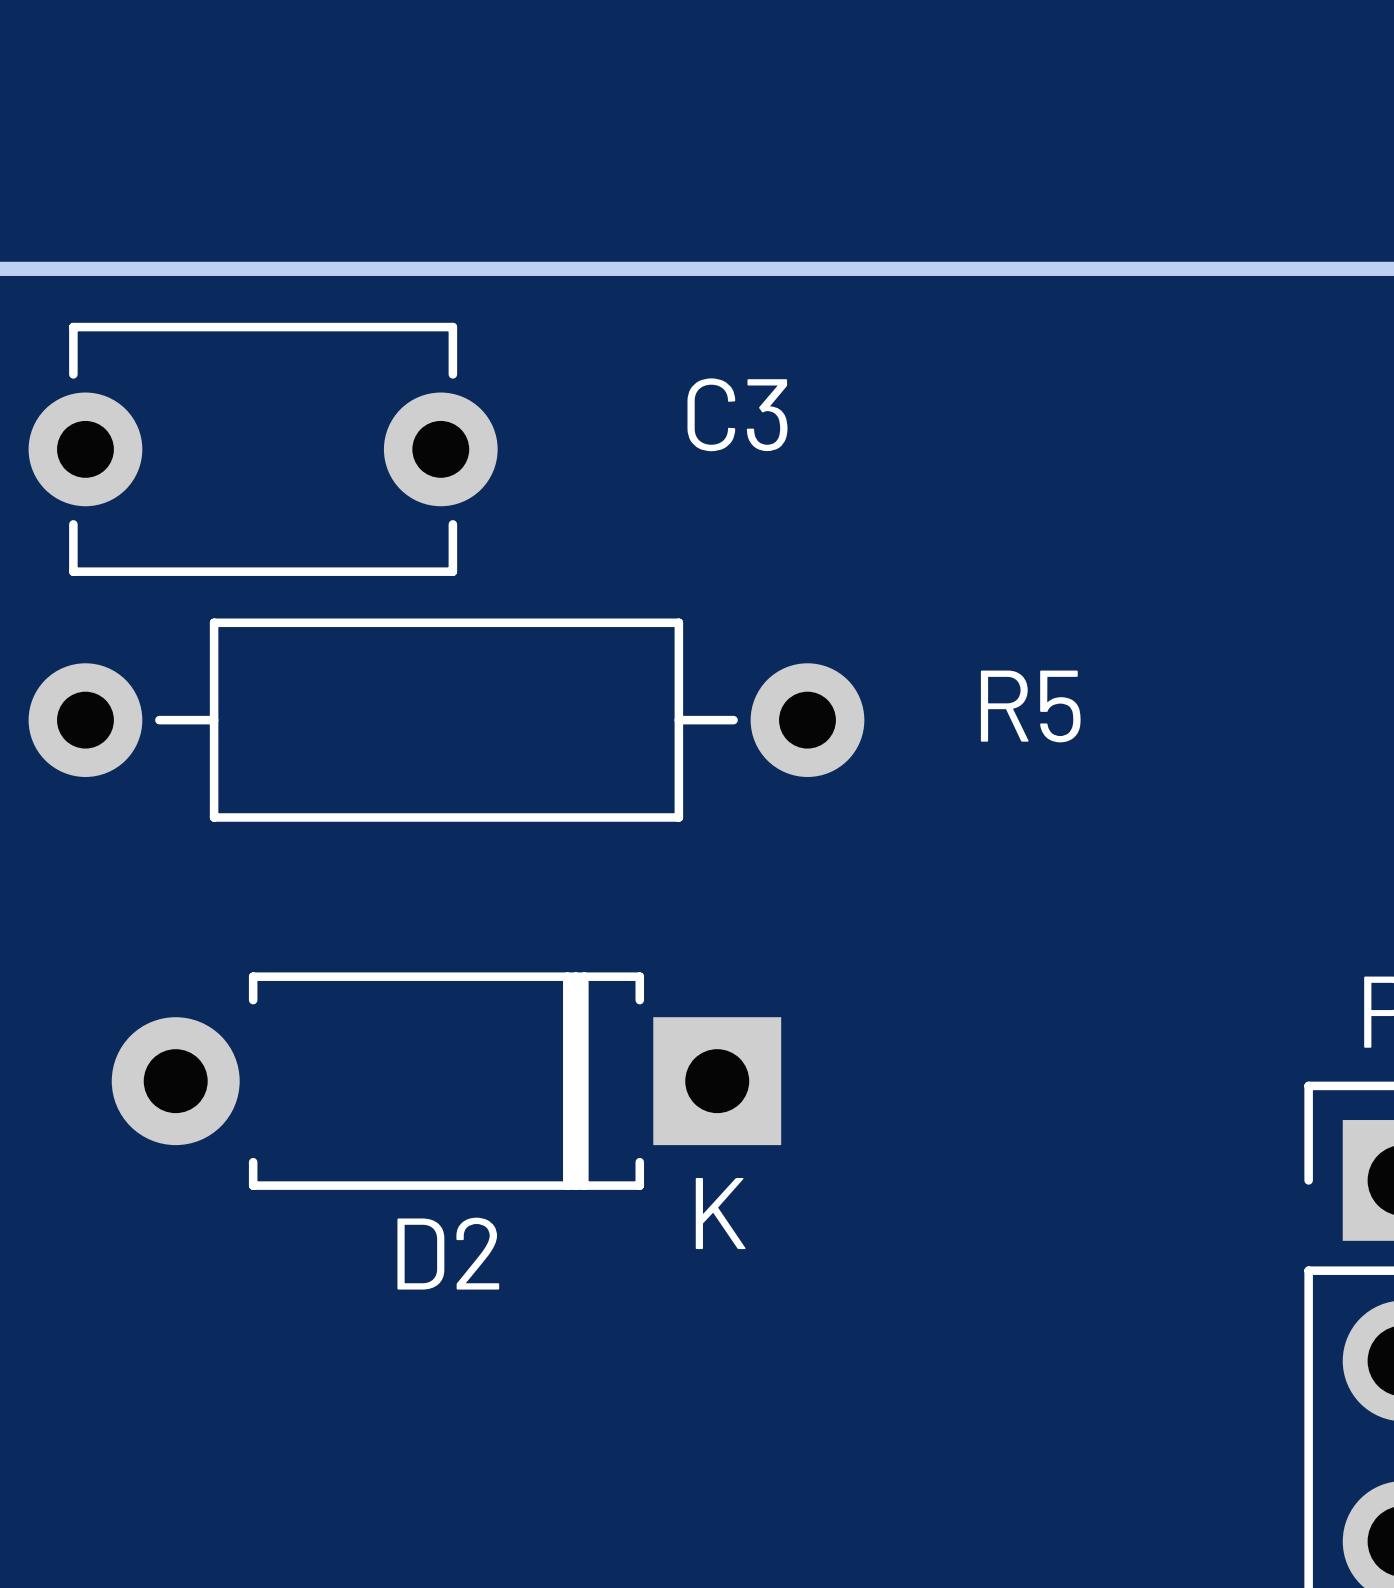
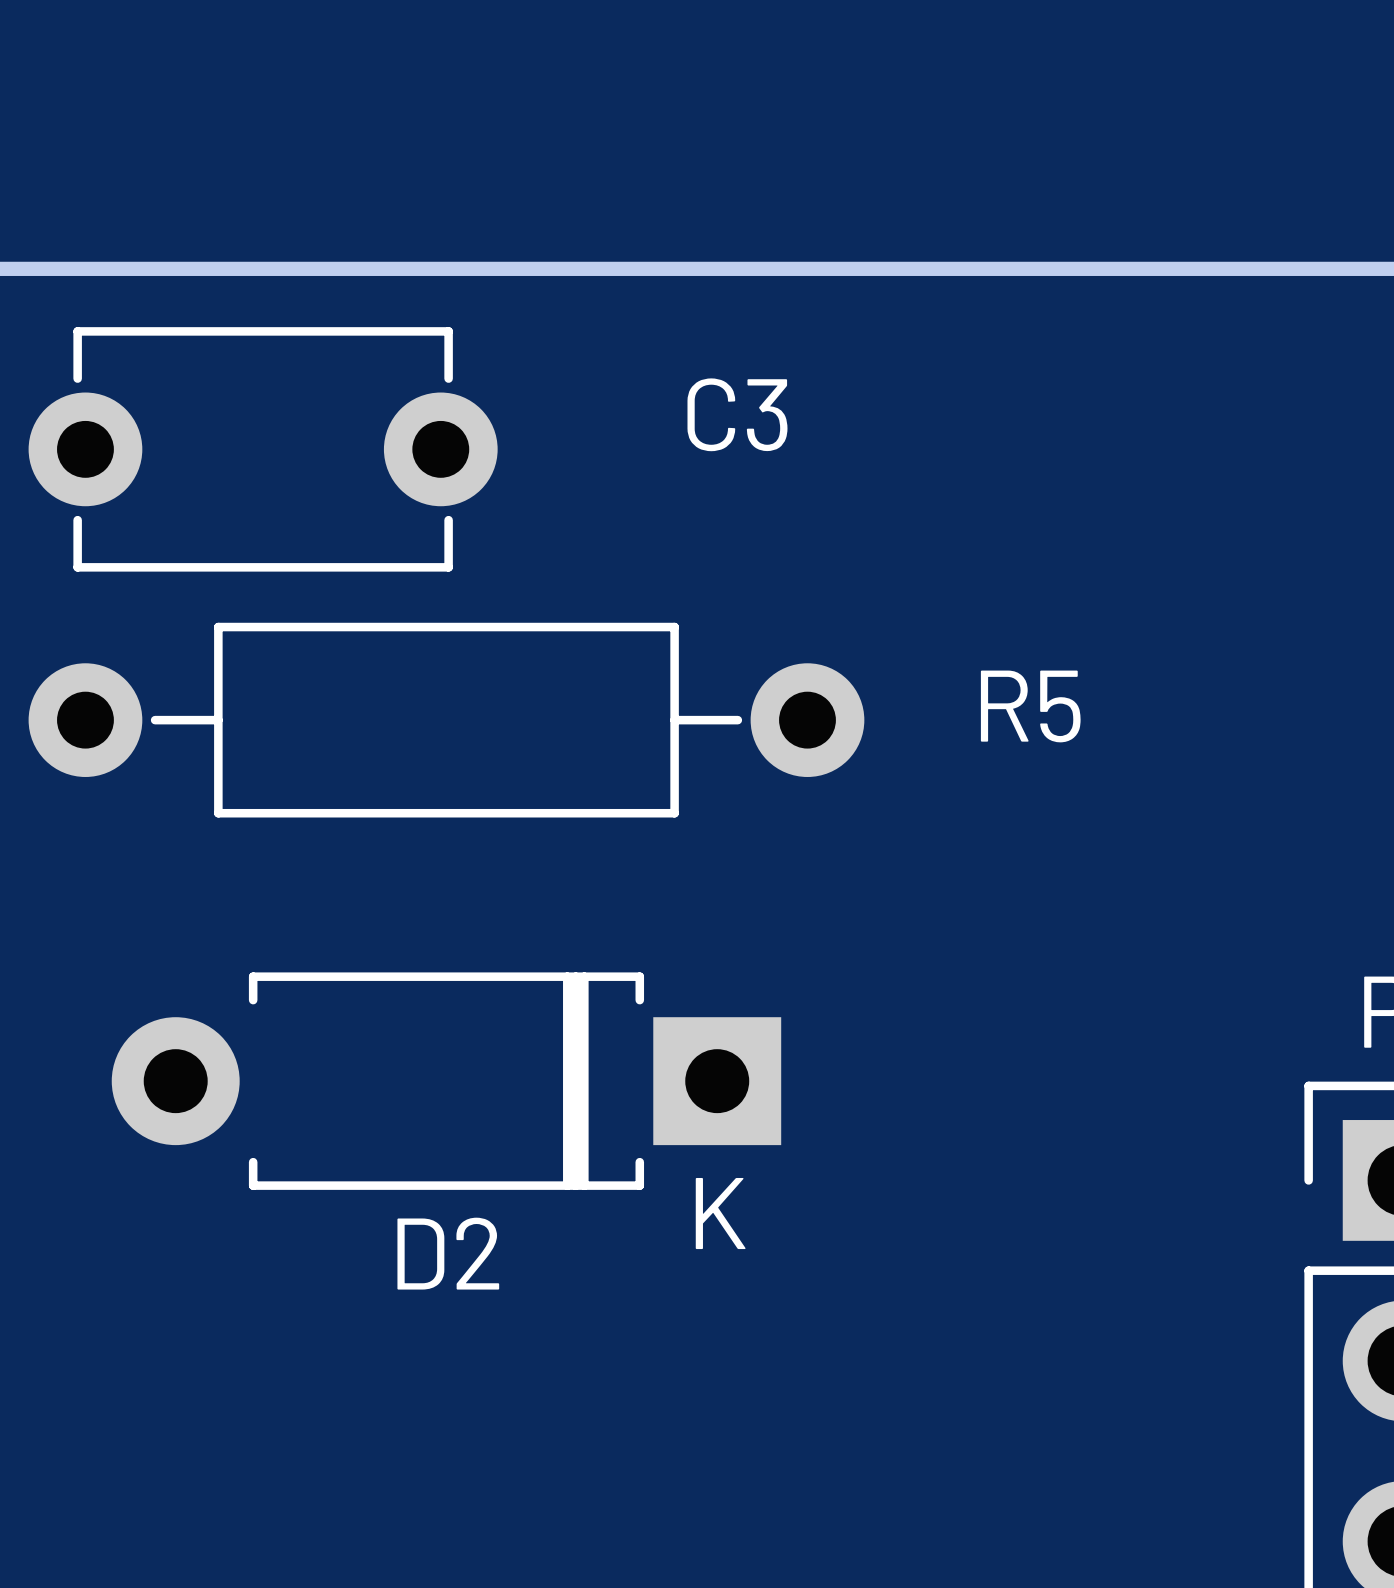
C3 footprint: [28, 322, 498, 576] -> [28, 327, 498, 572]
R5 footprint: [28, 618, 865, 822] -> [28, 622, 865, 818]

